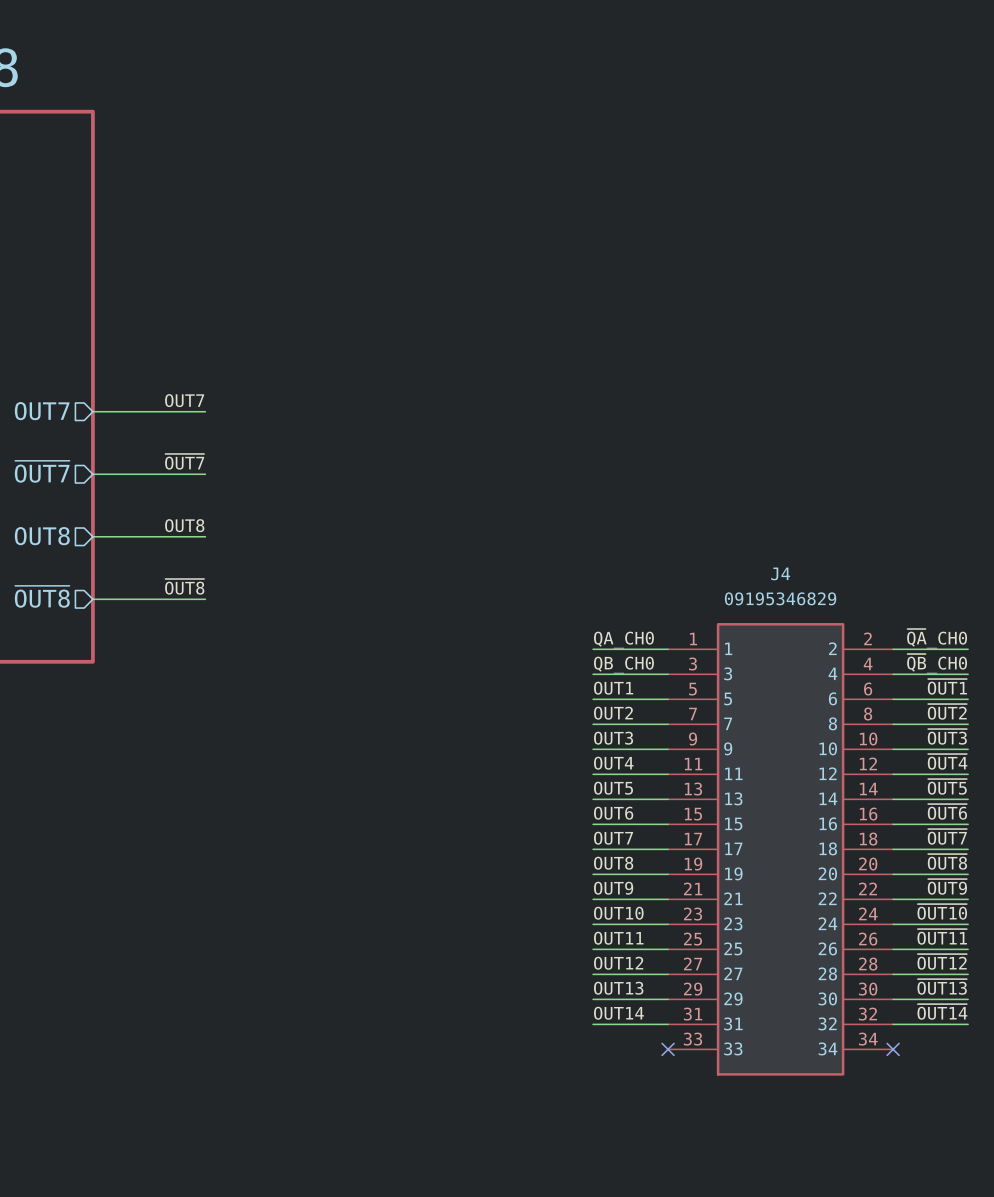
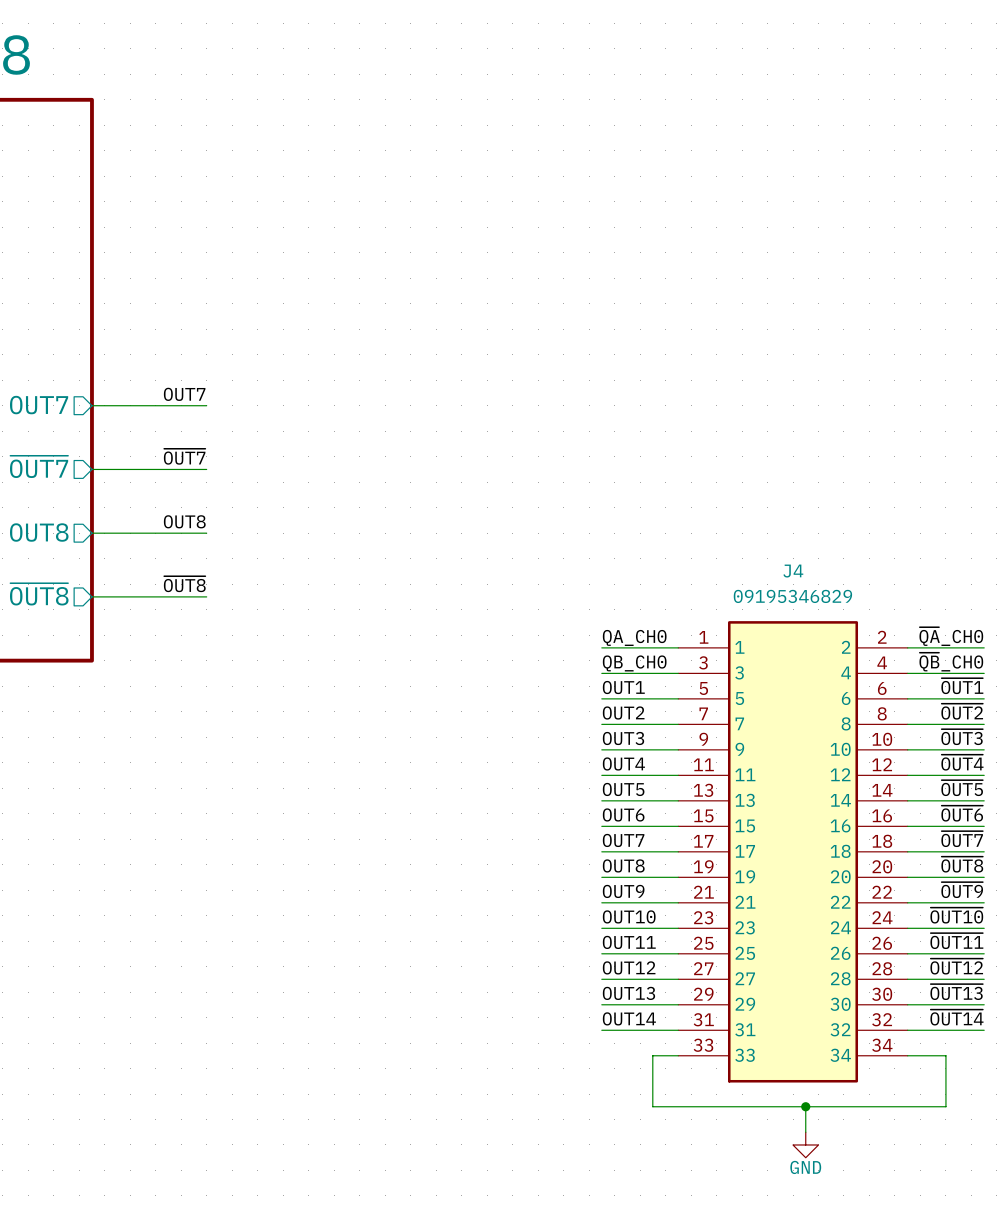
wire: none -> (678, 1055) (652, 1055) (652, 1106) (945, 1106) (945, 1055) (907, 1055)
no-connect mark: (668, 1049) -> none
no-connect mark: (893, 1049) -> none
wire: none -> (805, 1106) (805, 1132)
junction: none -> (805, 1106)
power symbol: none -> GND (805, 1144)

